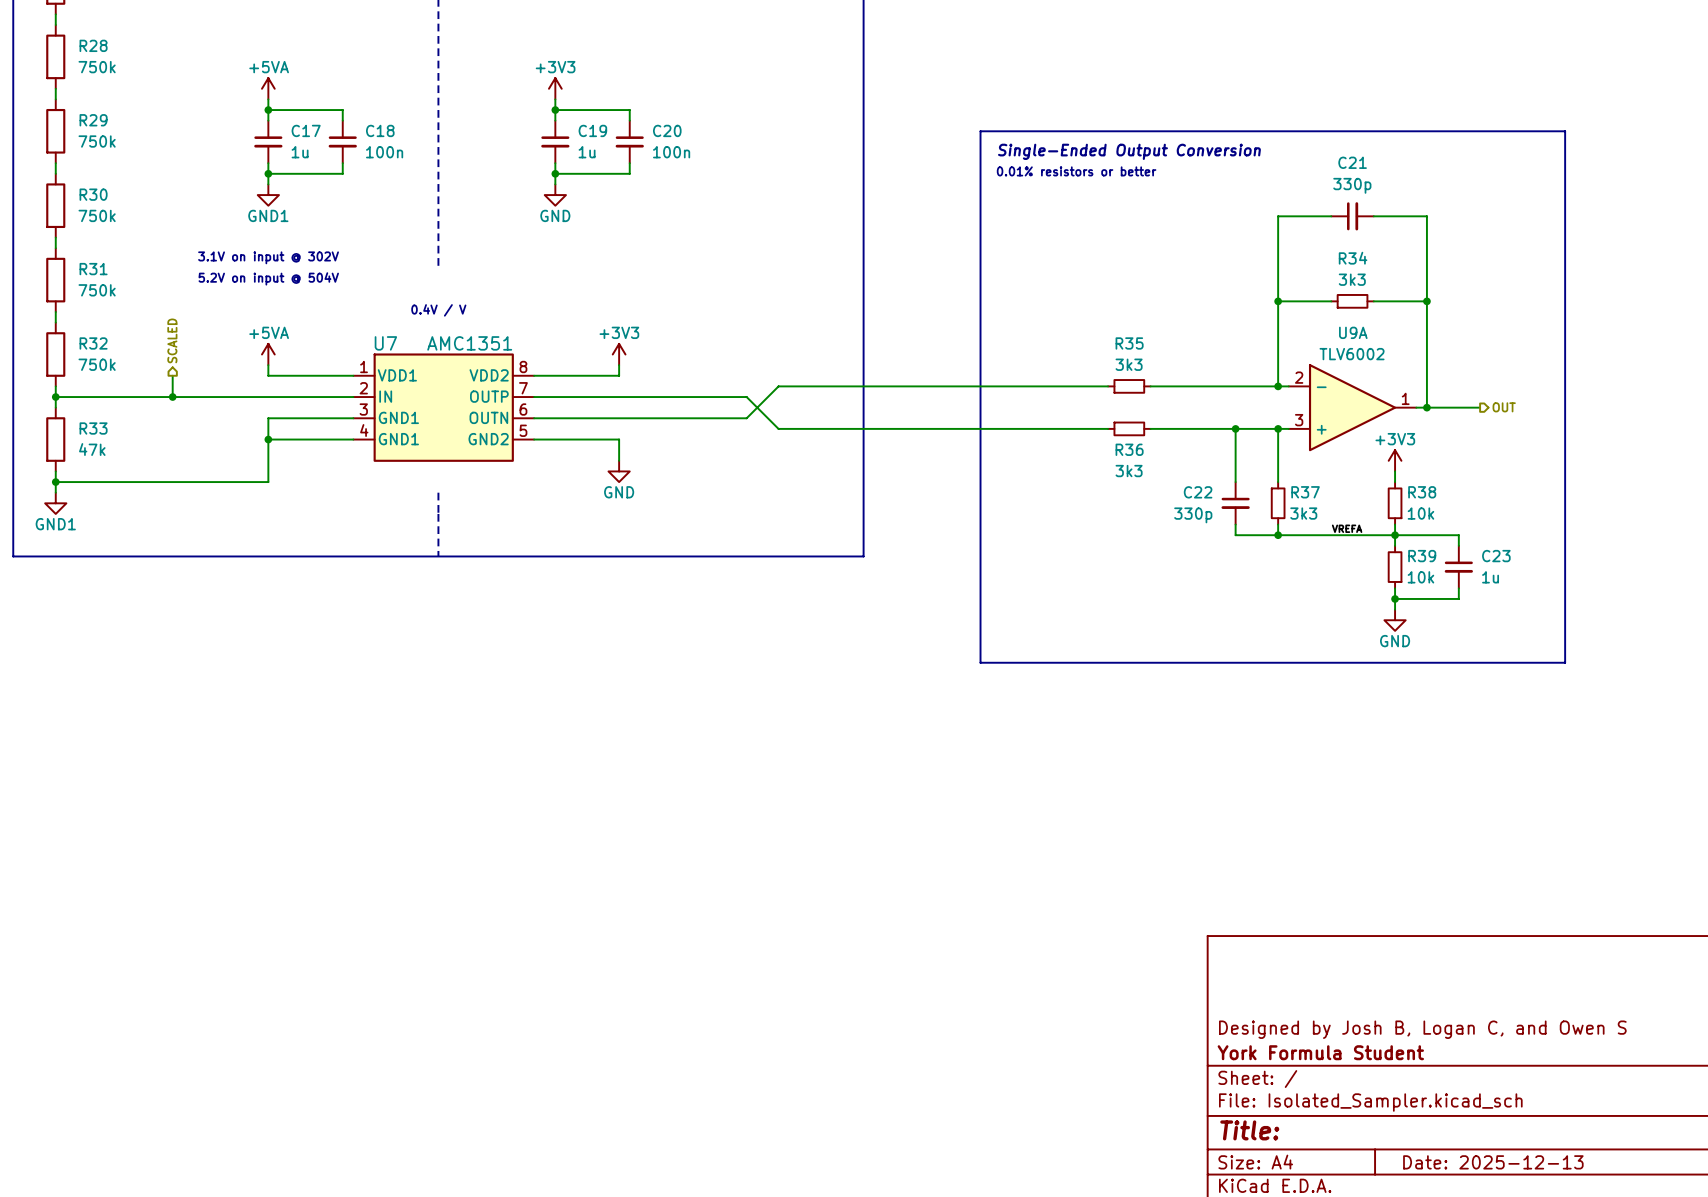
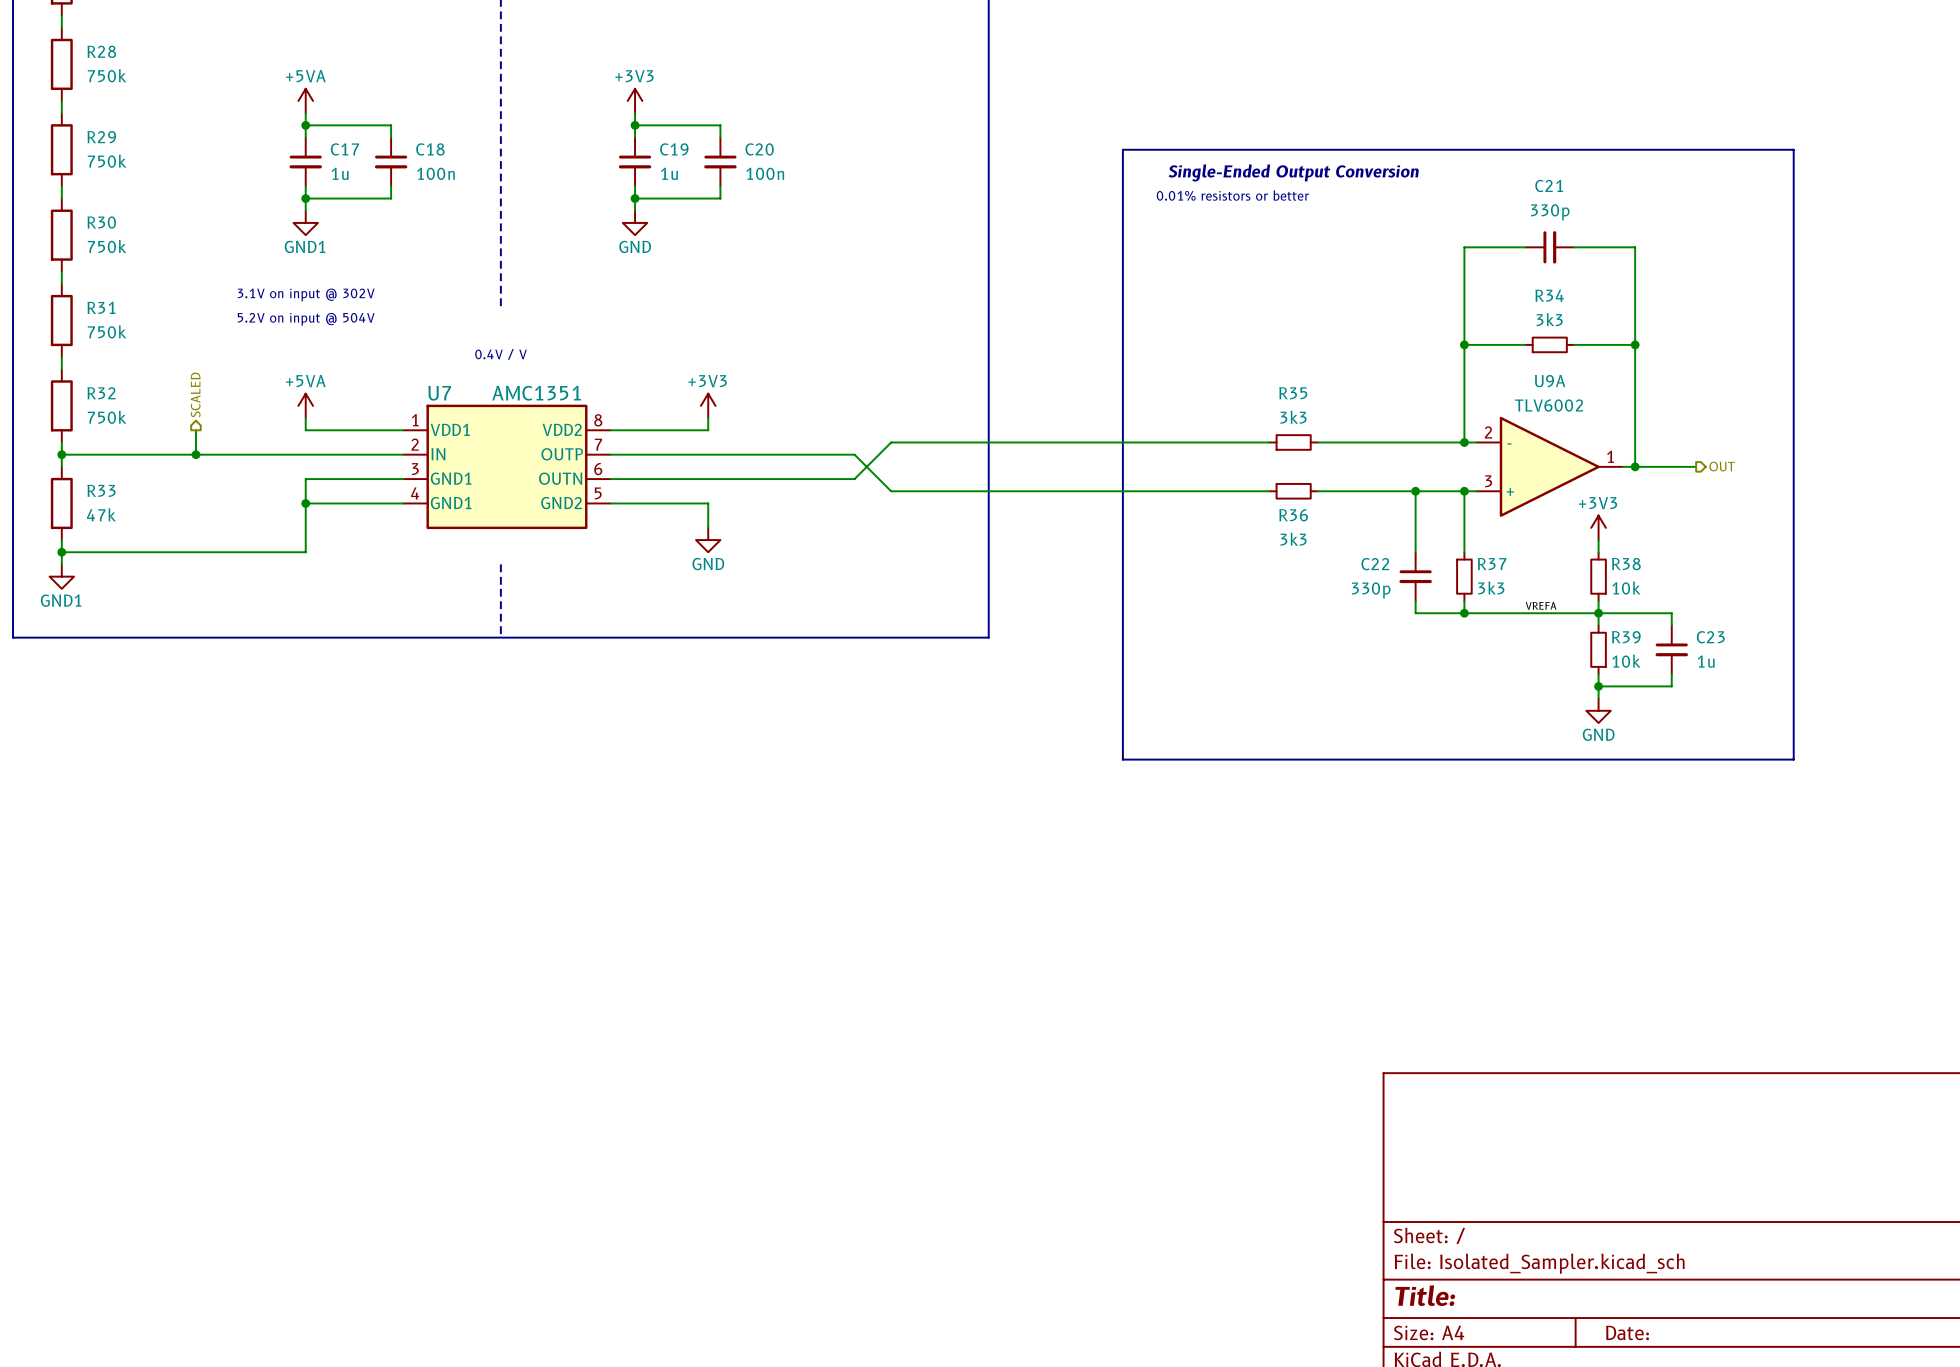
title block: Designed by Josh B, Logan C, and Owen S (1422, 1029) -> none
title block: York Formula Student (1320, 1052) -> none
title block: Date: 2025-12-13 (1493, 1162) -> Date: (1627, 1332)

